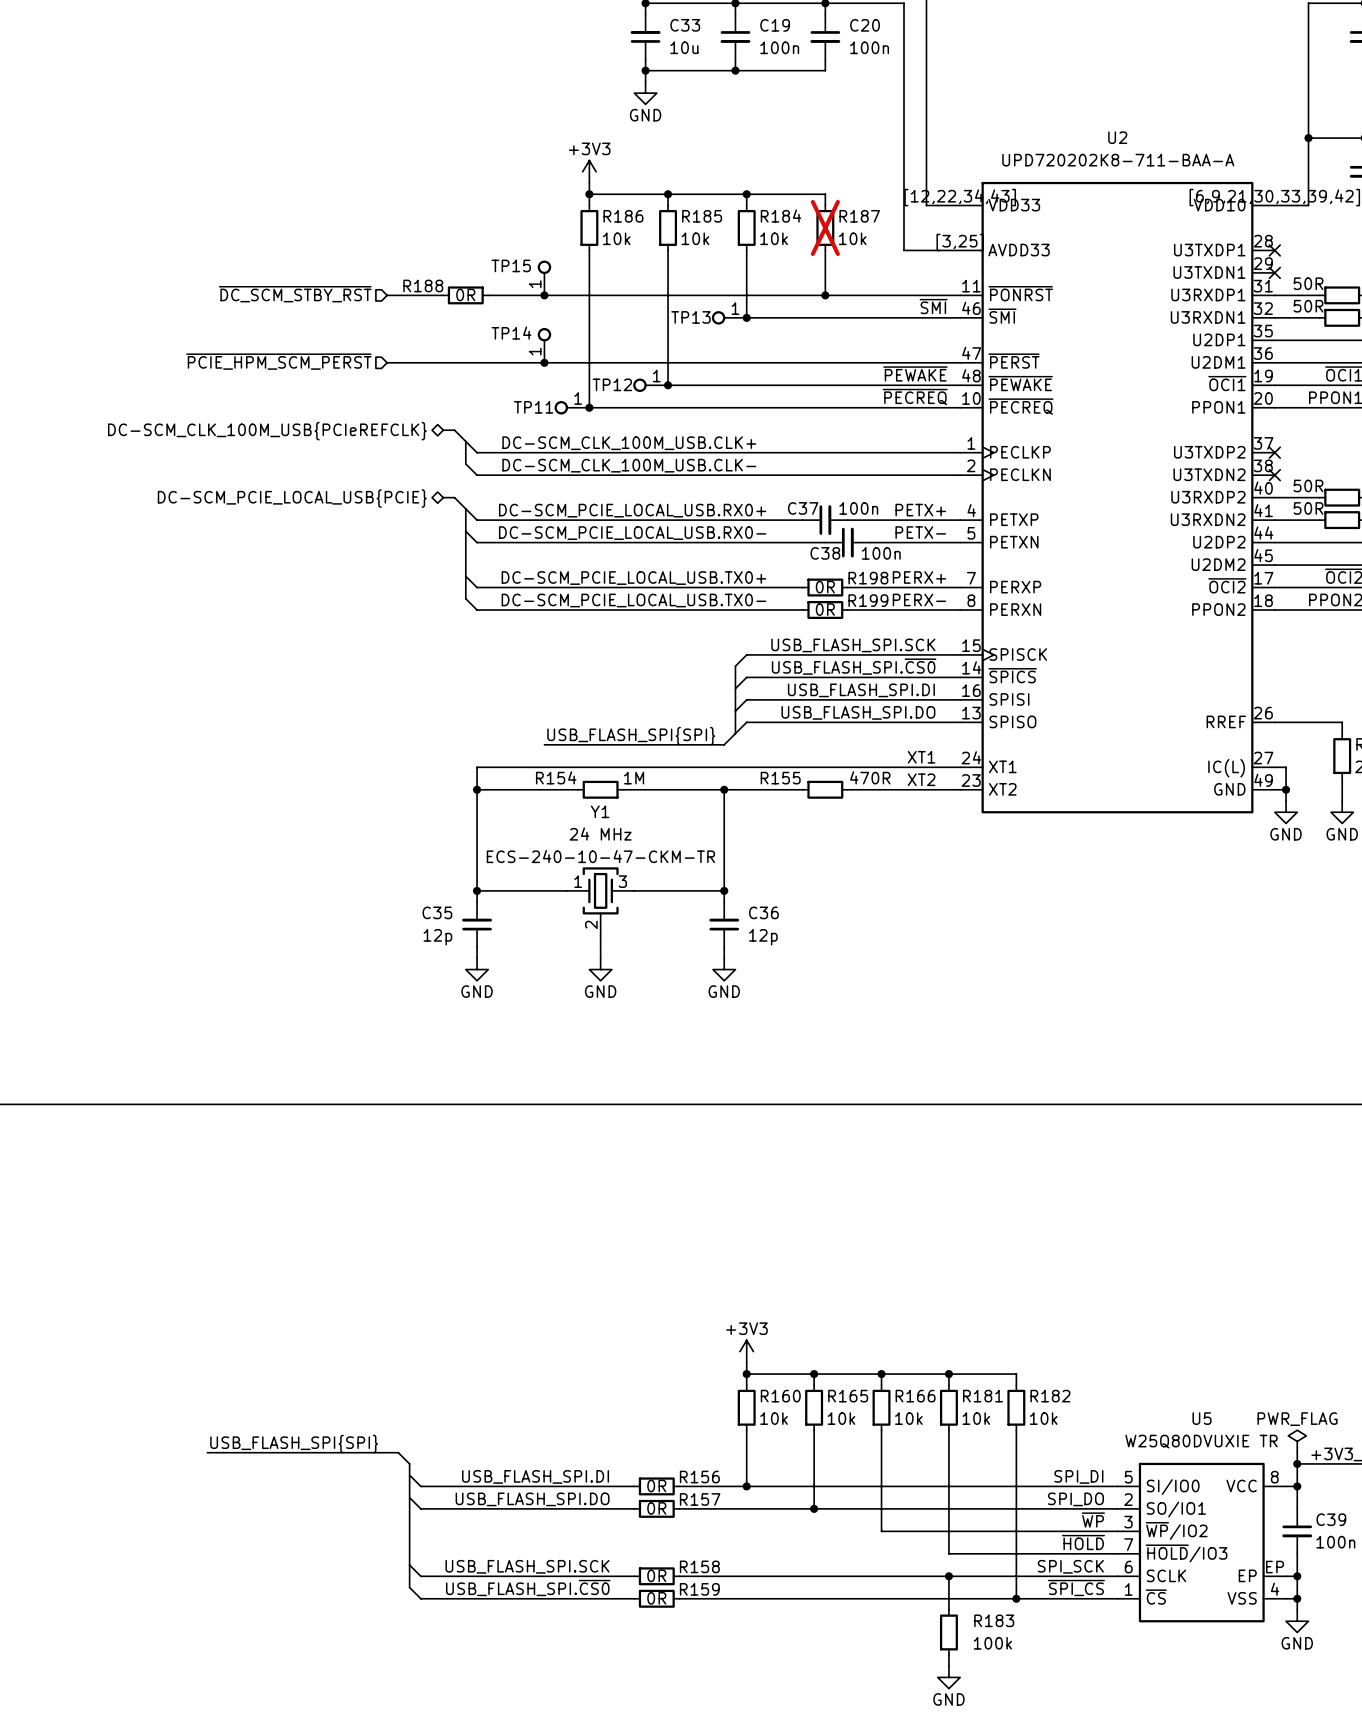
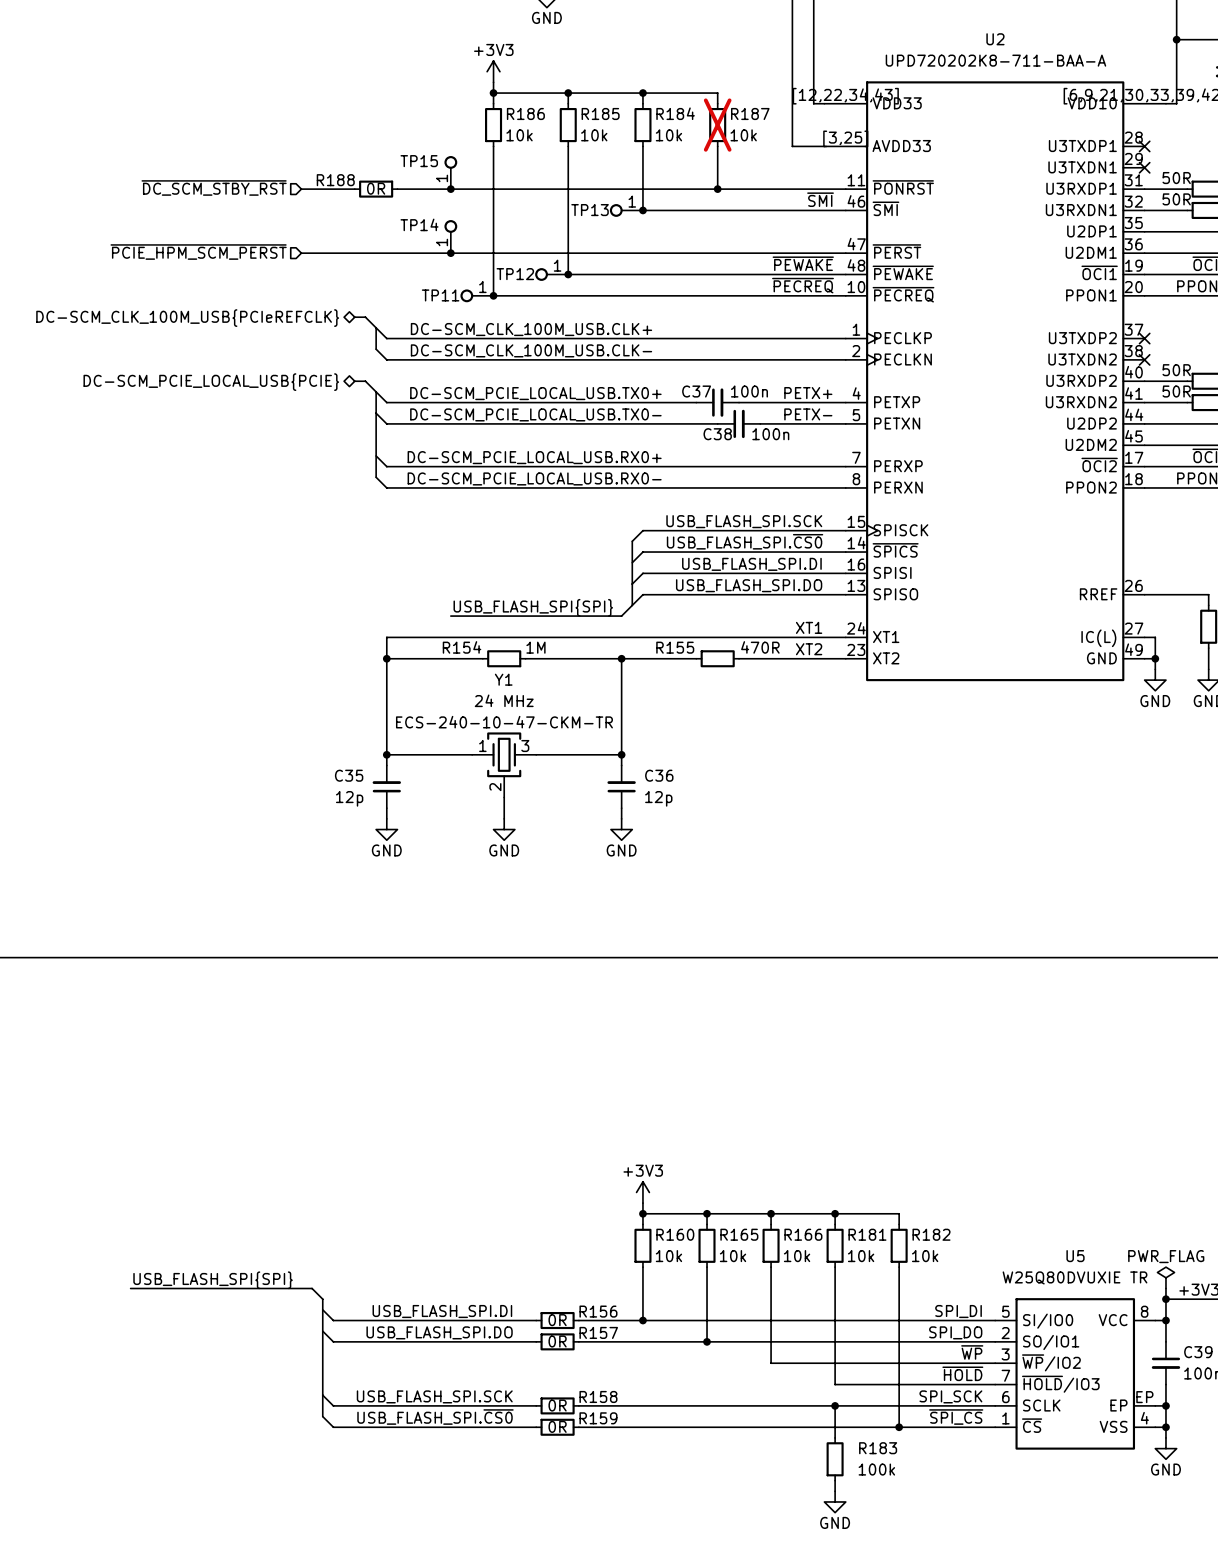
label: DC-SCM_PCIE_LOCAL_USB.RX0+ (632, 510) -> DC-SCM_PCIE_LOCAL_USB.TX0+ (535, 393)
label: DC-SCM_PCIE_LOCAL_USB.RX0- (632, 533) -> DC-SCM_PCIE_LOCAL_USB.TX0- (535, 414)
label: PERX+ (919, 577) -> none
label: DC-SCM_PCIE_LOCAL_USB.TX0+ (633, 578) -> DC-SCM_PCIE_LOCAL_USB.RX0+ (534, 457)
wire: none -> (696, 466) (739, 466)
R198: (825, 587) -> none
label: PERX- (919, 599) -> none
label: DC-SCM_PCIE_LOCAL_USB.TX0- (633, 600) -> DC-SCM_PCIE_LOCAL_USB.RX0- (534, 478)
wire: none -> (696, 487) (739, 487)
R199: (825, 610) -> none

